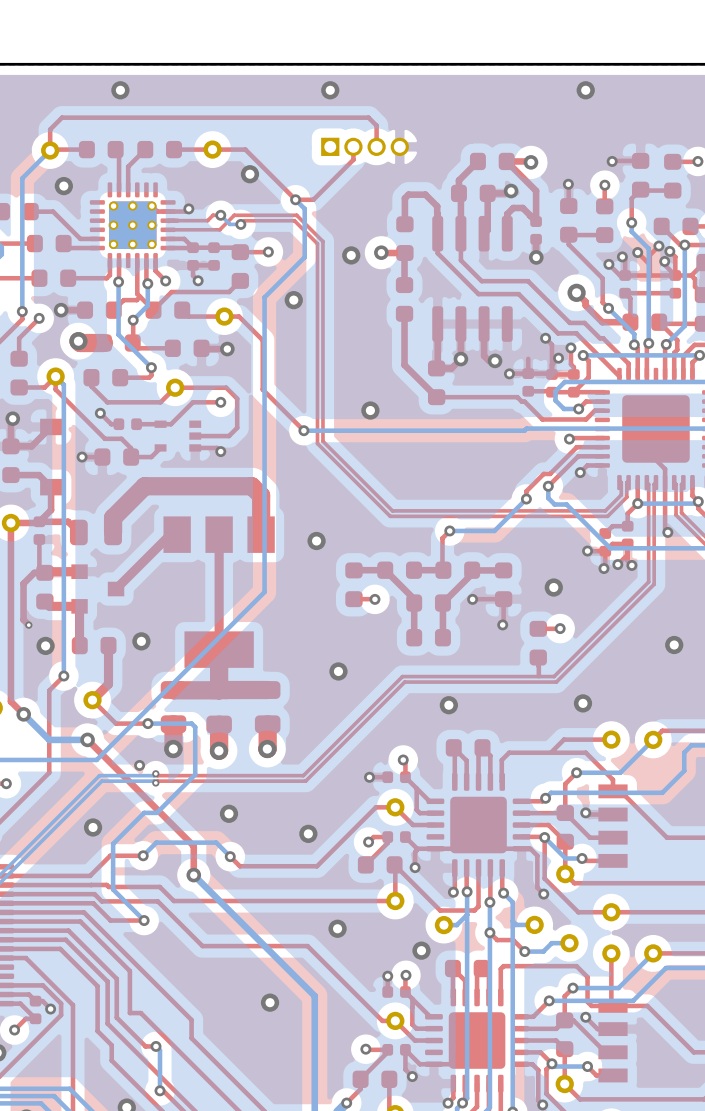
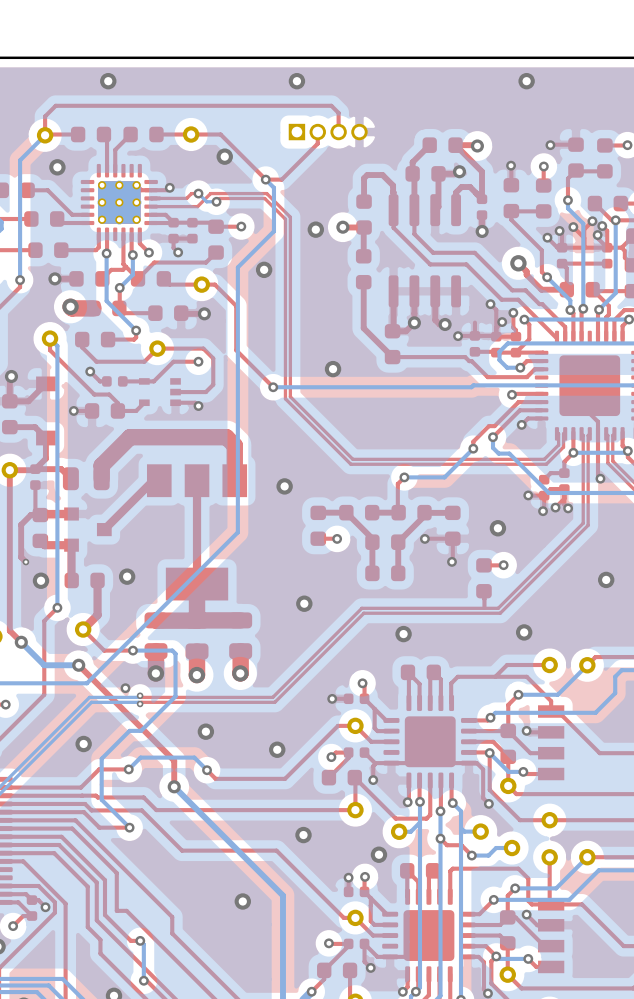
top track: (39, 318) (19, 338) (19, 358) -> none
via: (39, 318) -> none
part: (19, 373) -> none
top track: (55, 376) (44, 387) (19, 387) -> none

